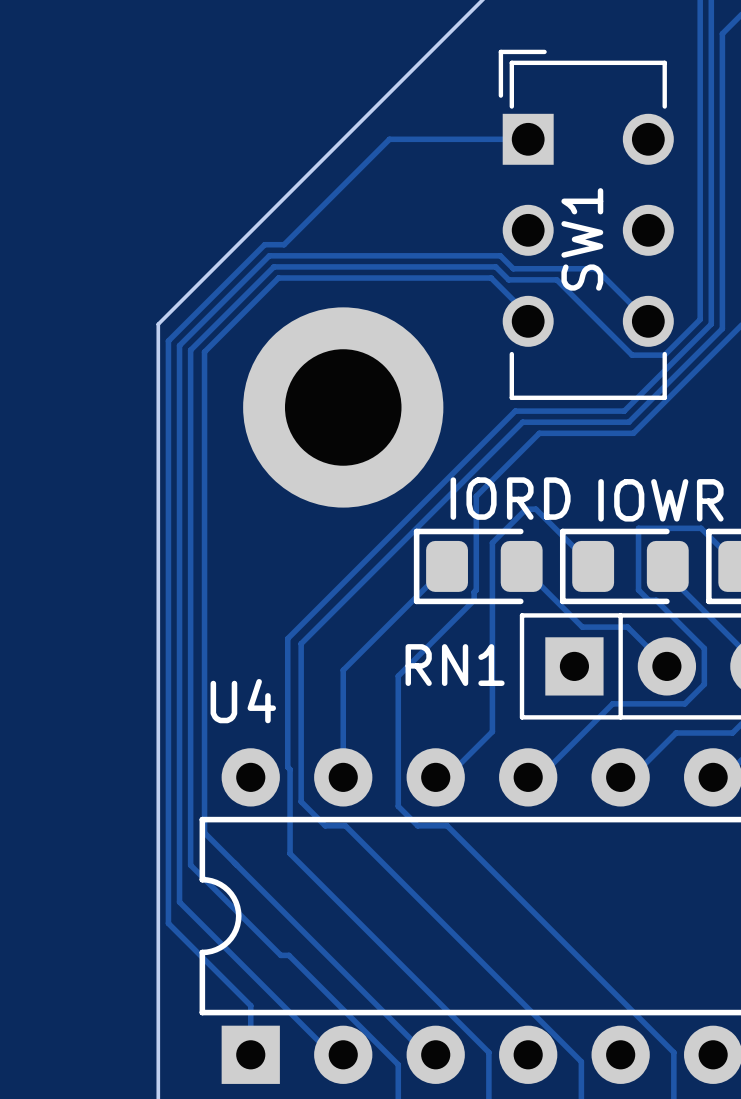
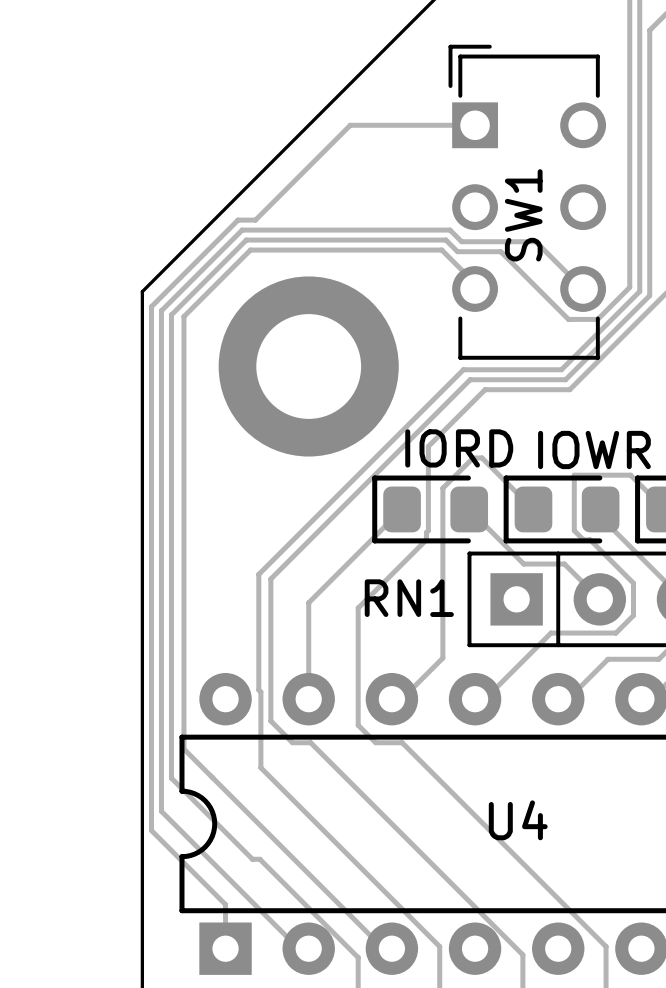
U4 name position: U4 (243, 701) -> U4 (518, 820)

